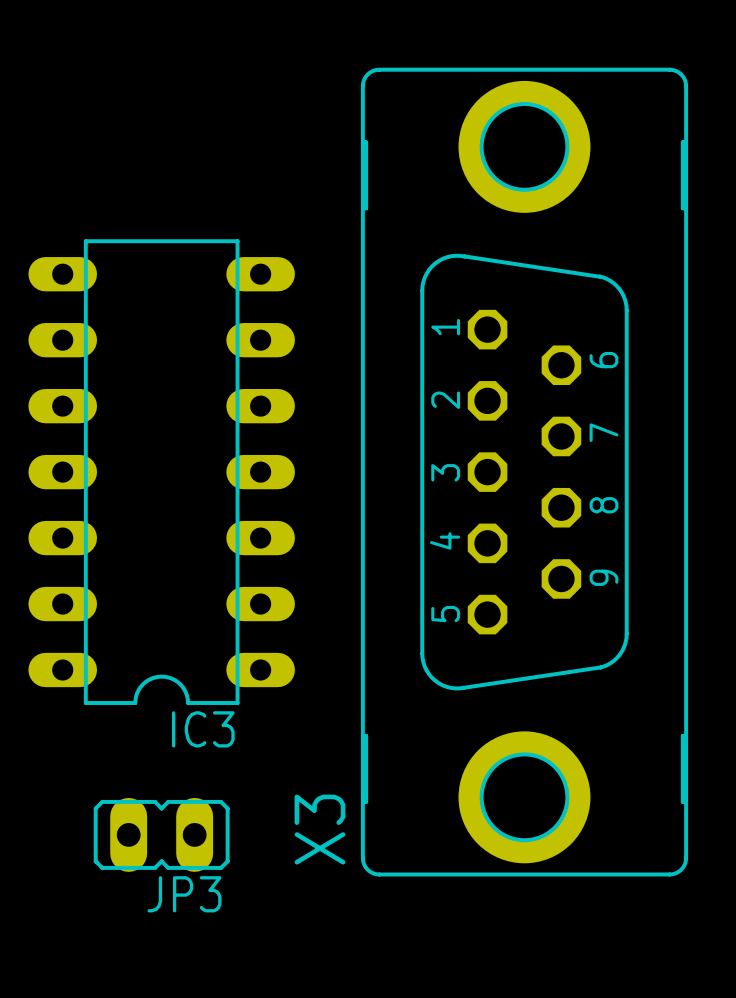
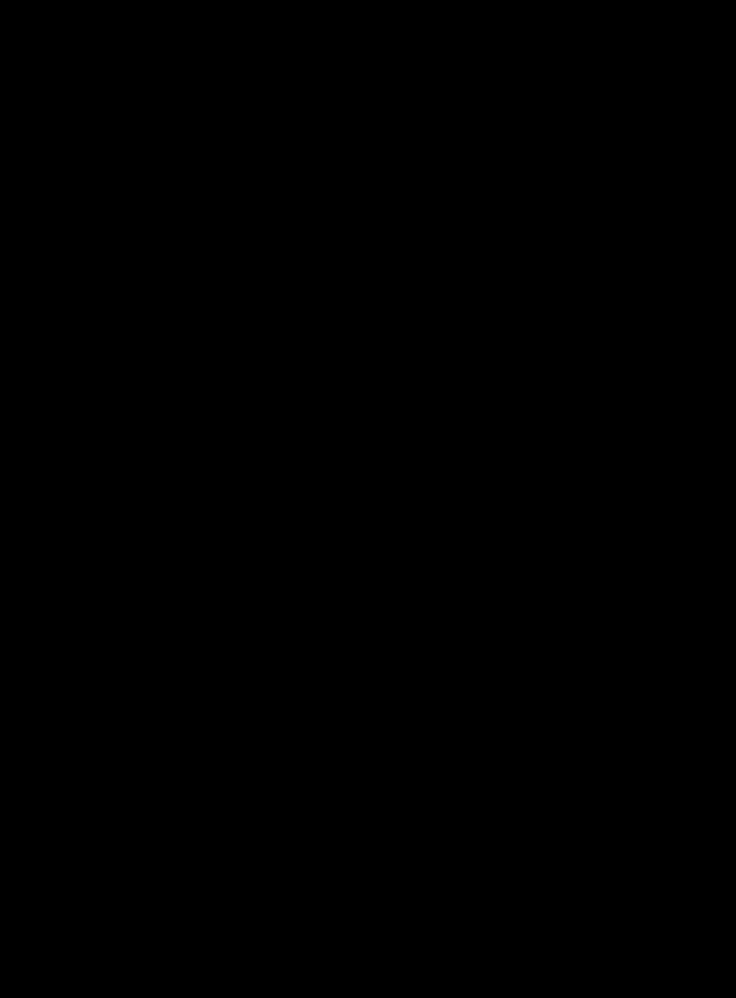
IC3: (161, 472) -> none
X3: (524, 472) -> none
JP3: (161, 834) -> none

